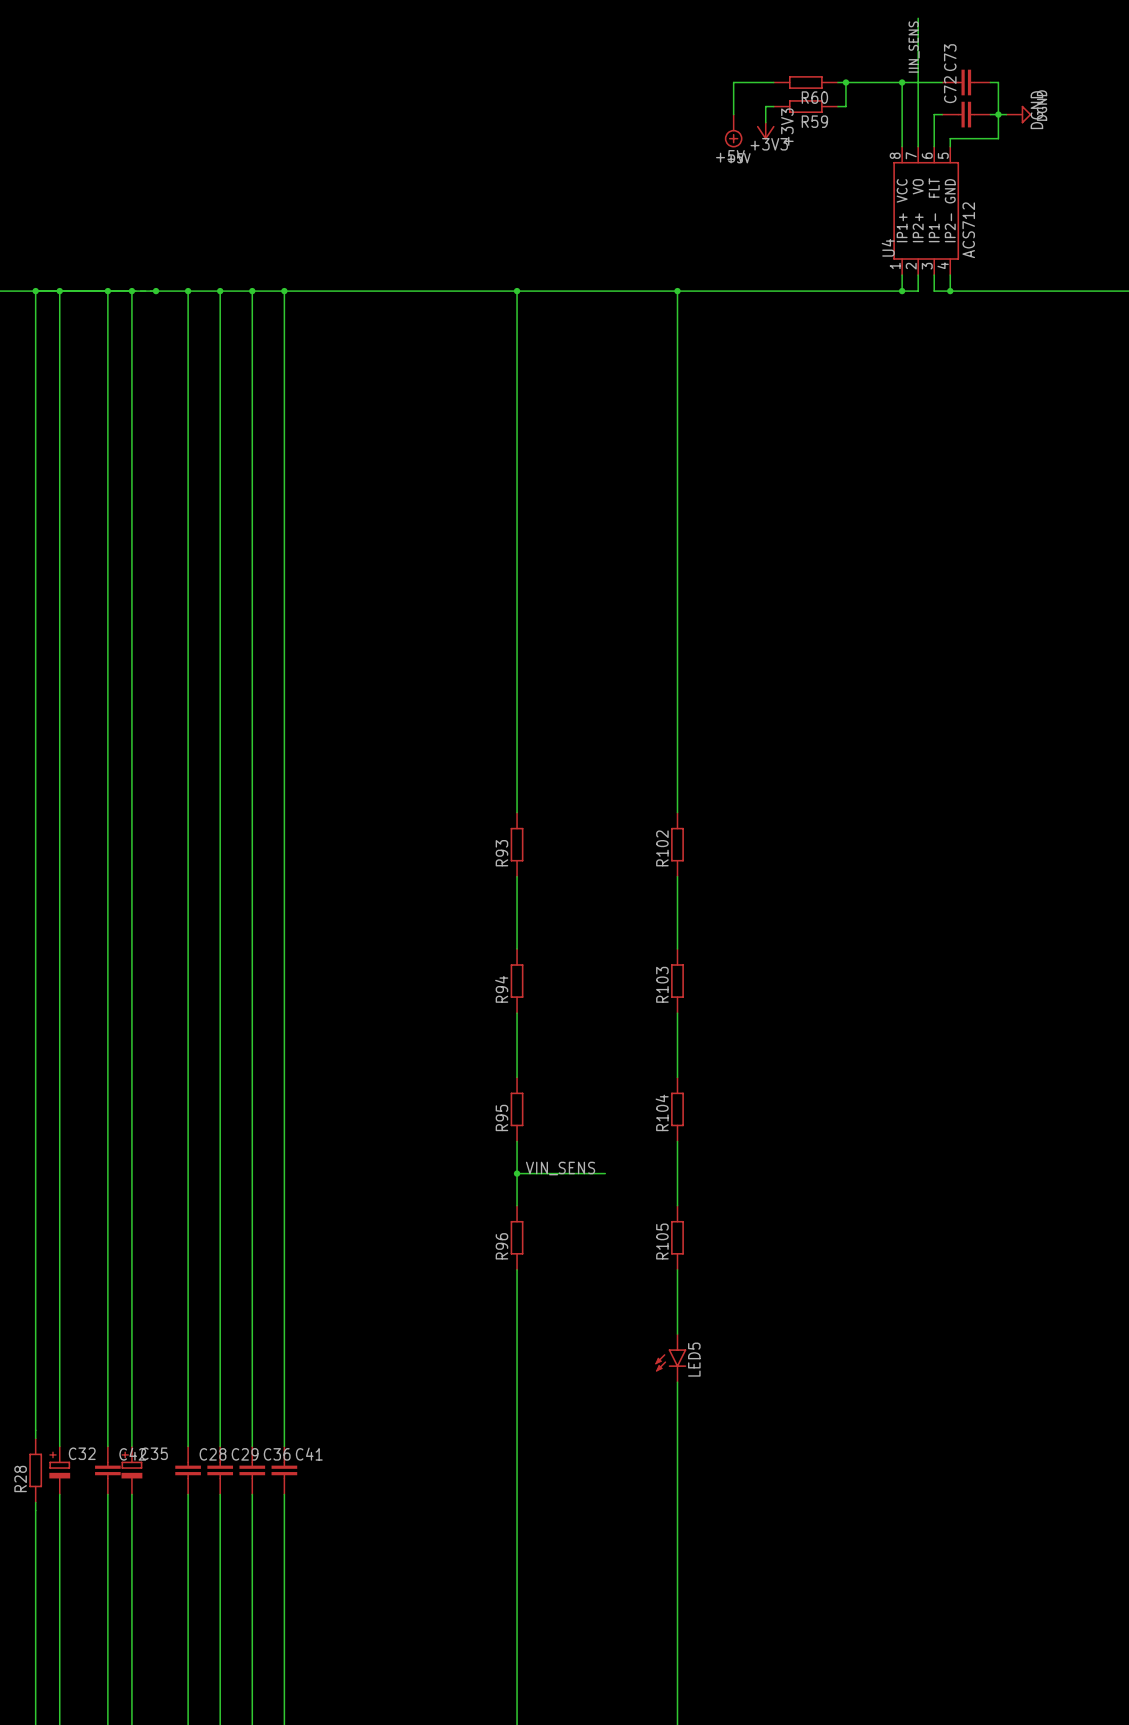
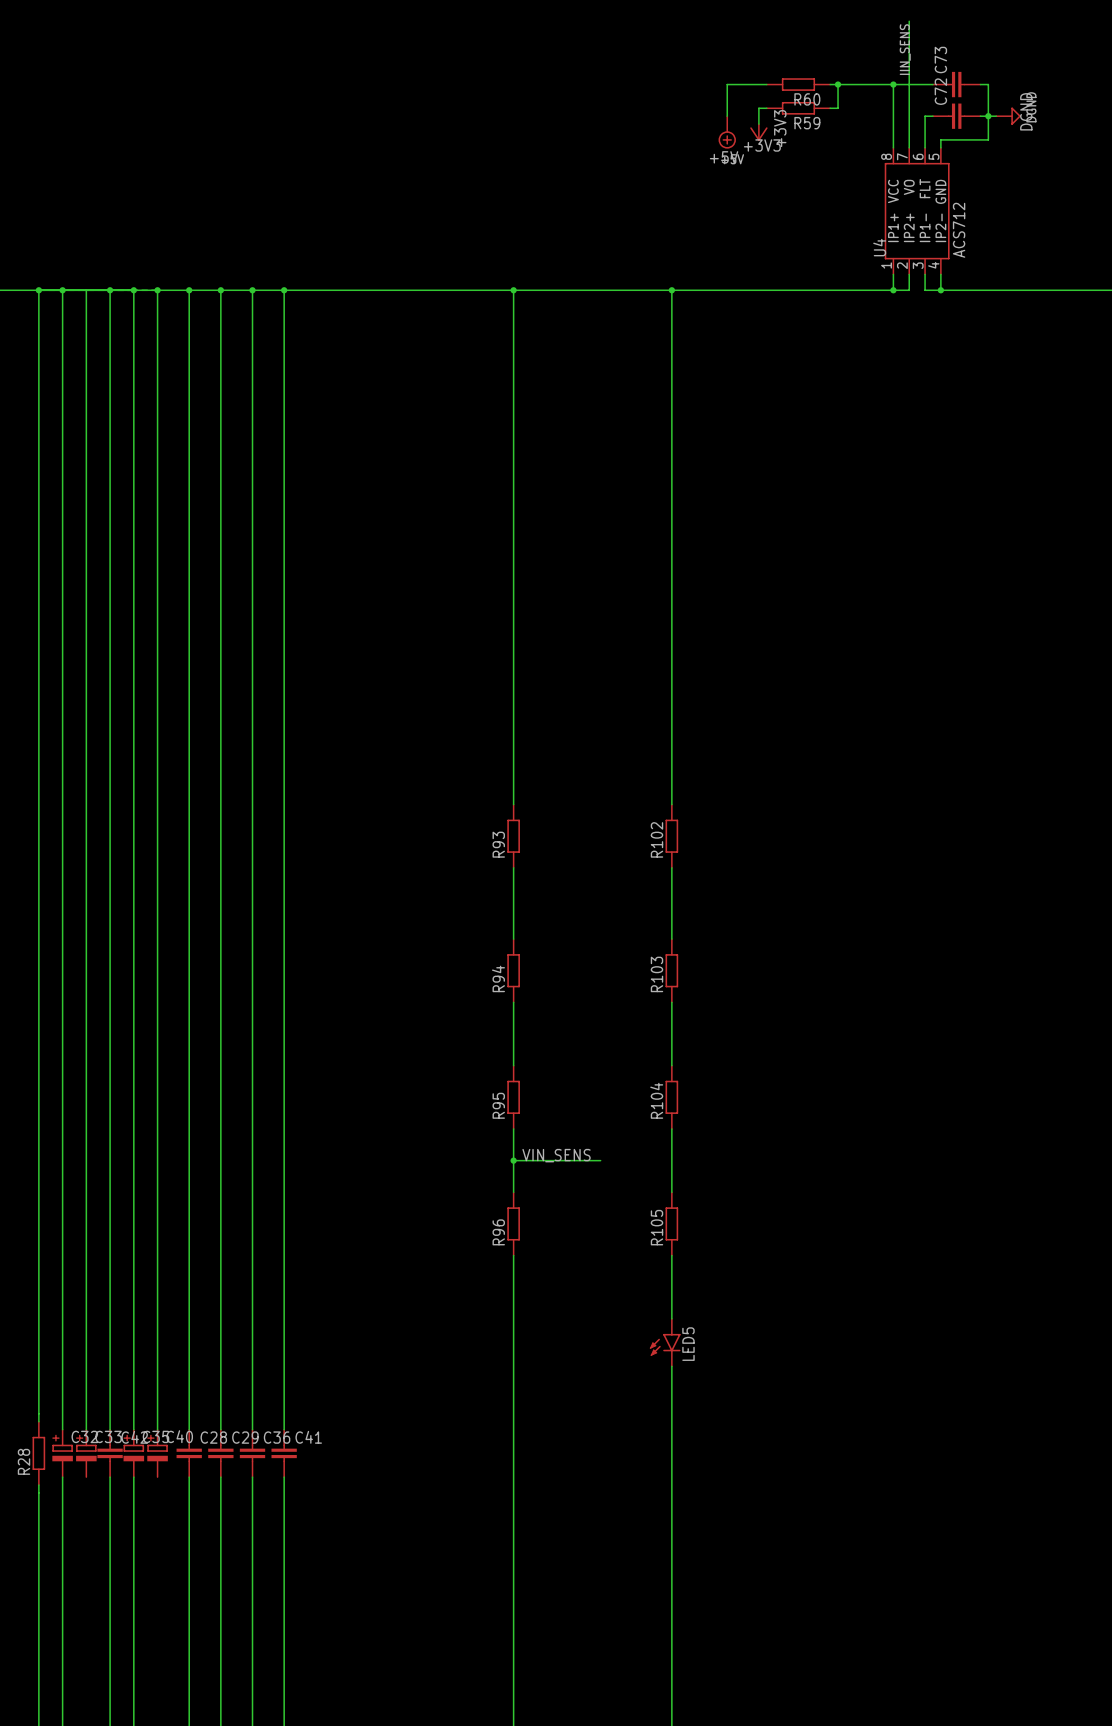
wire: none -> (86, 290) (86, 1429)
wire: none -> (157, 290) (157, 1429)
C33: none -> (86, 1453)
C40: none -> (157, 1453)

